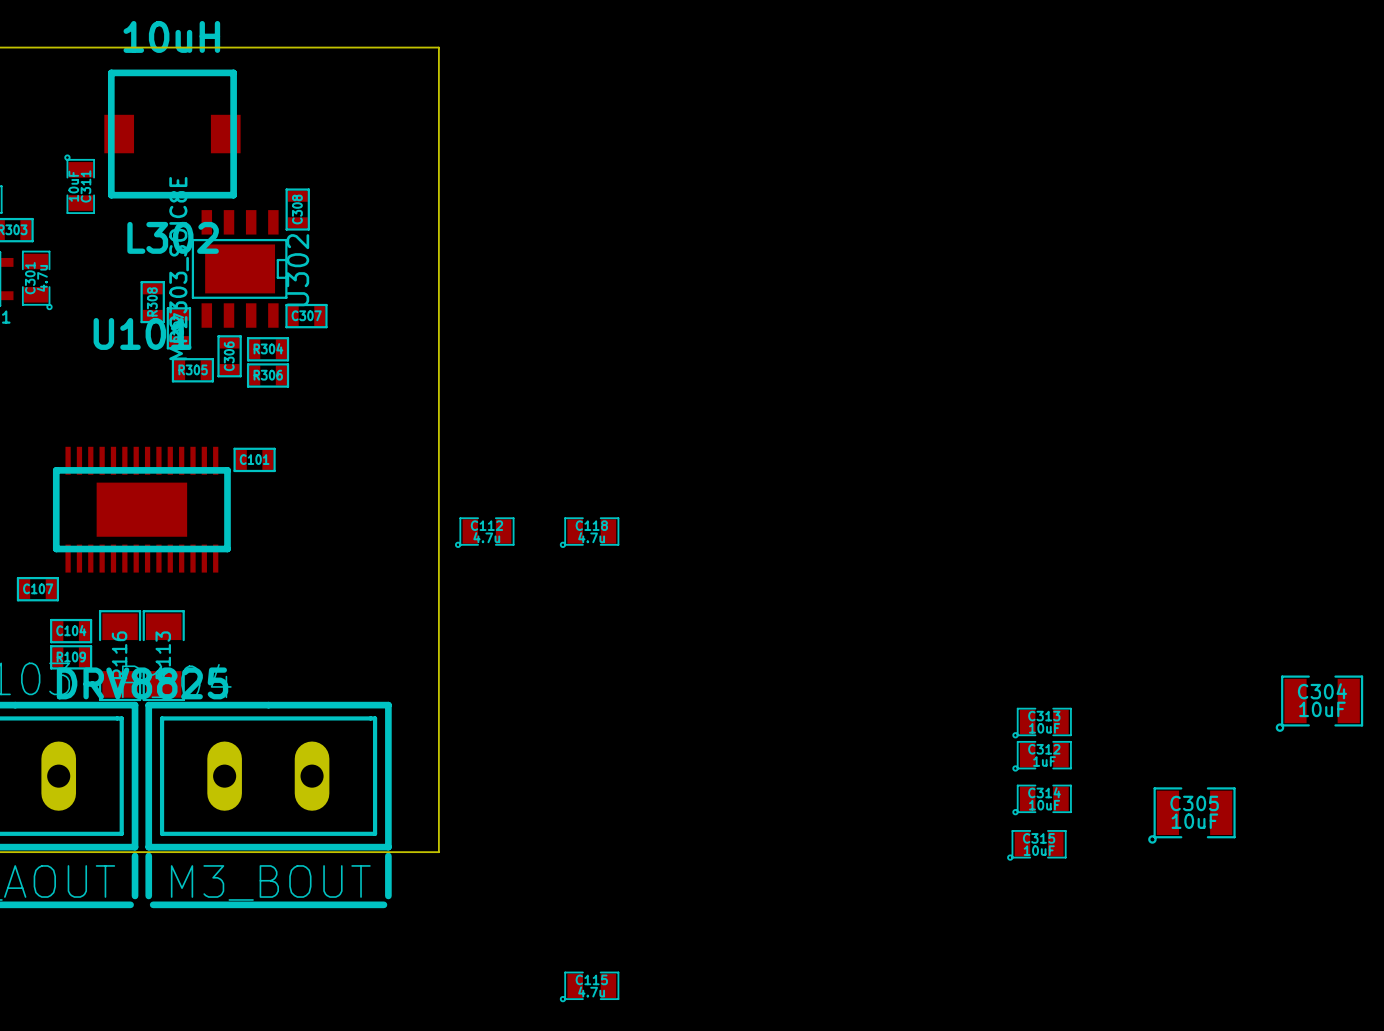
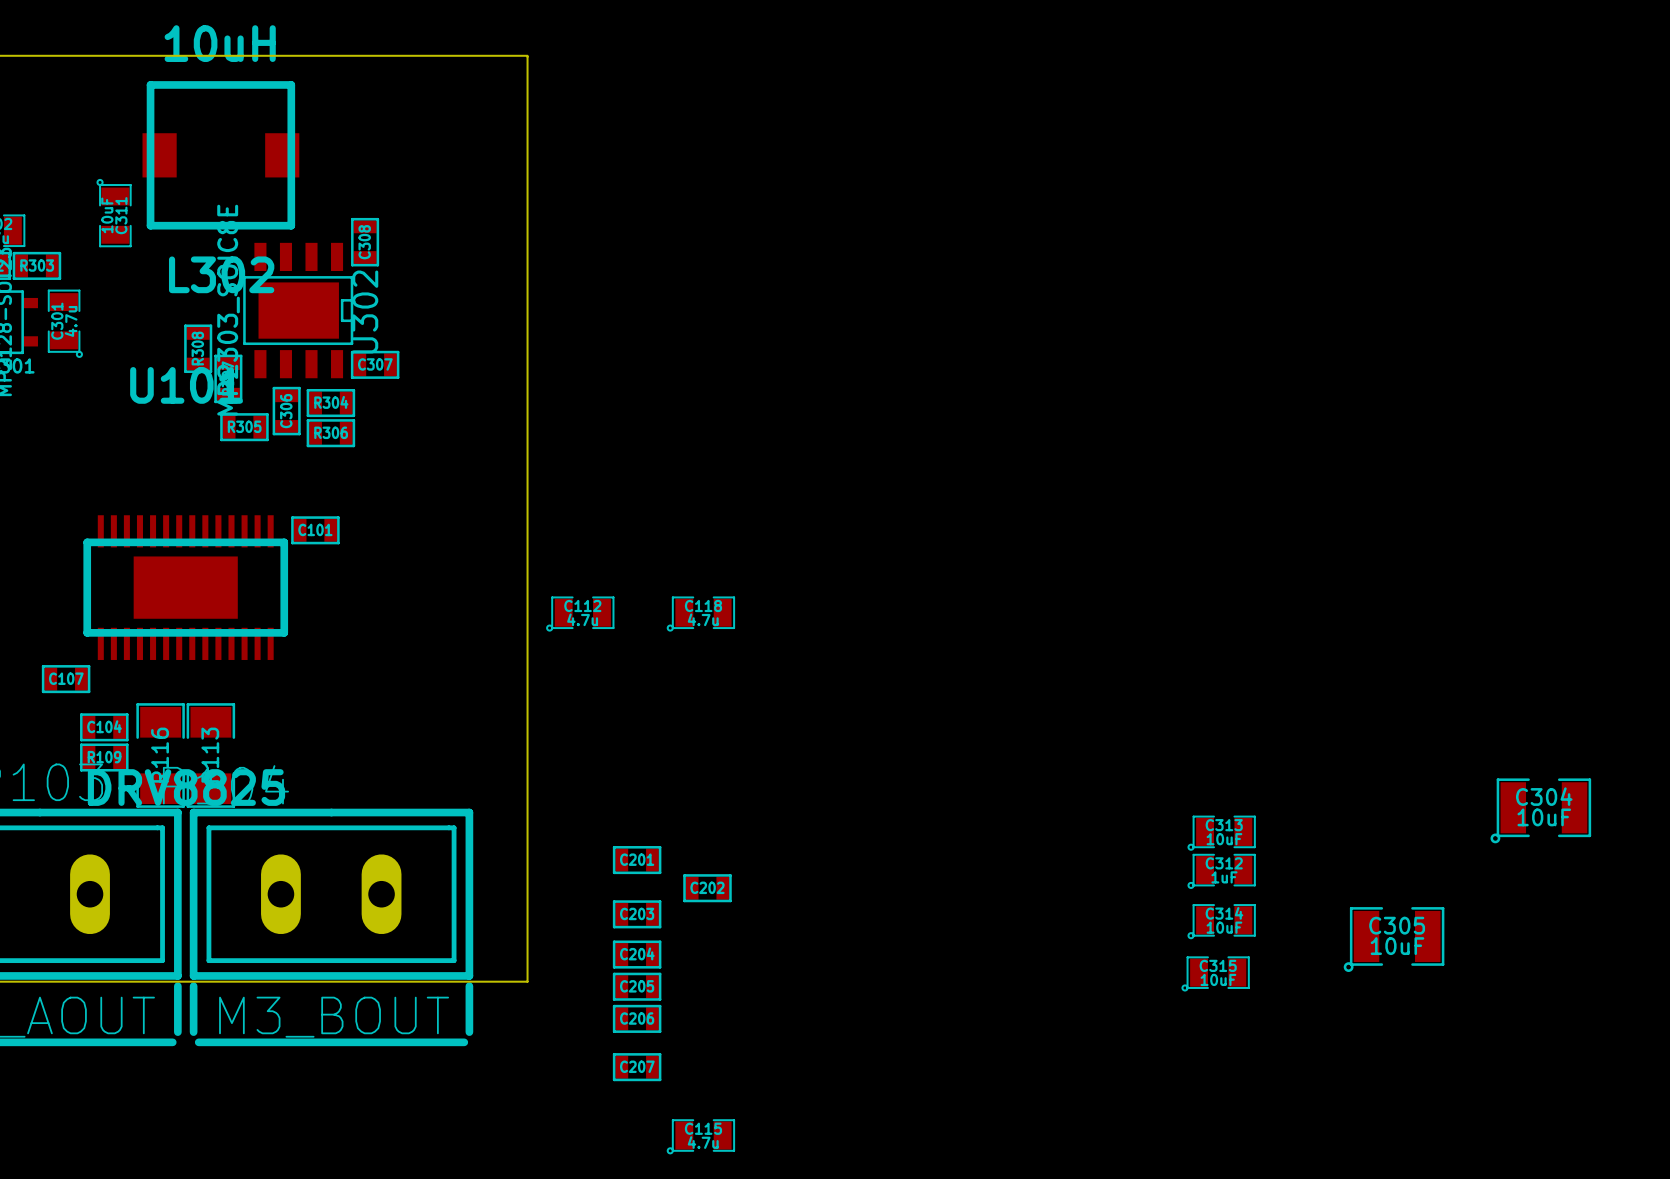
C201: none -> (637, 860)
C202: none -> (707, 888)
C203: none -> (637, 914)
C204: none -> (637, 954)
C205: none -> (637, 986)
C206: none -> (637, 1018)
C207: none -> (637, 1067)

